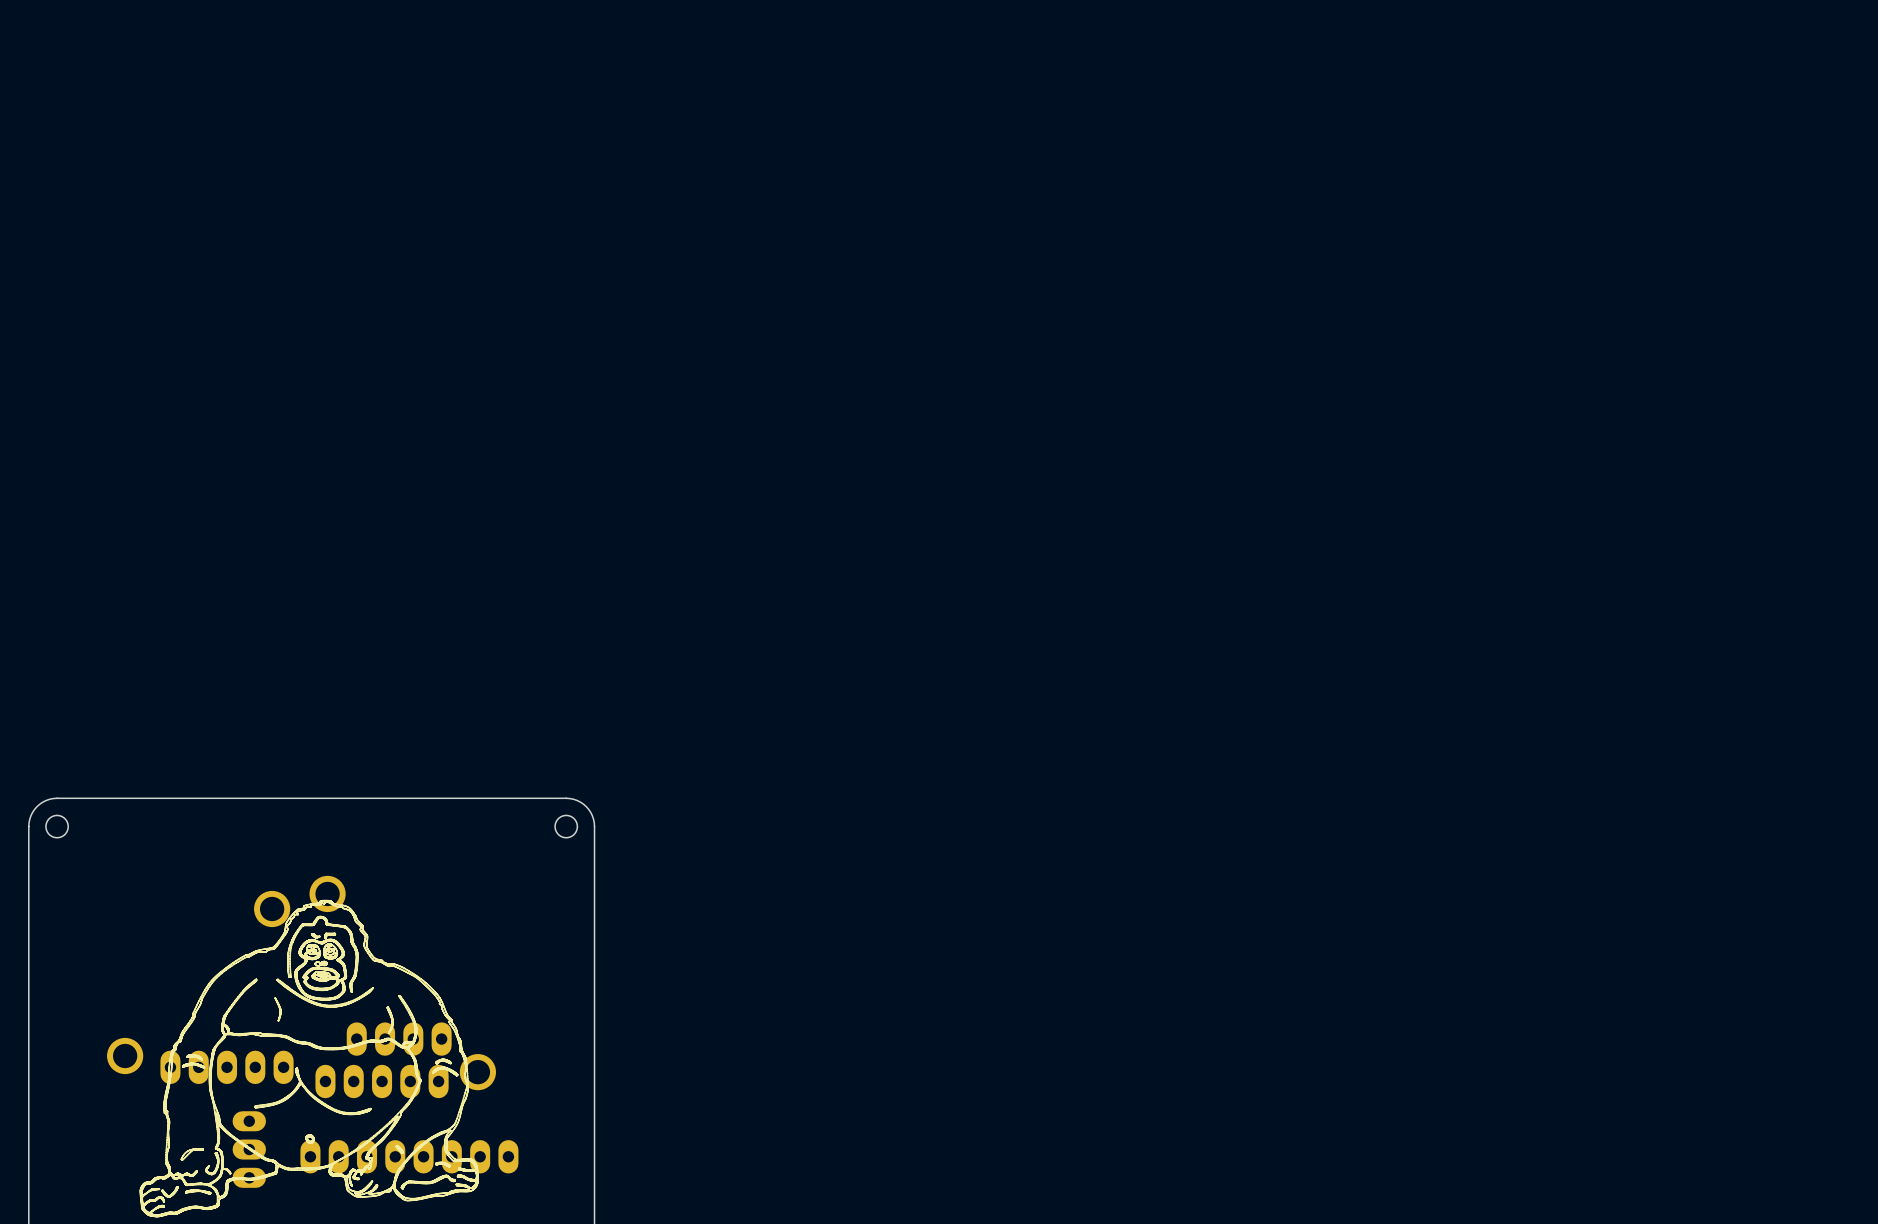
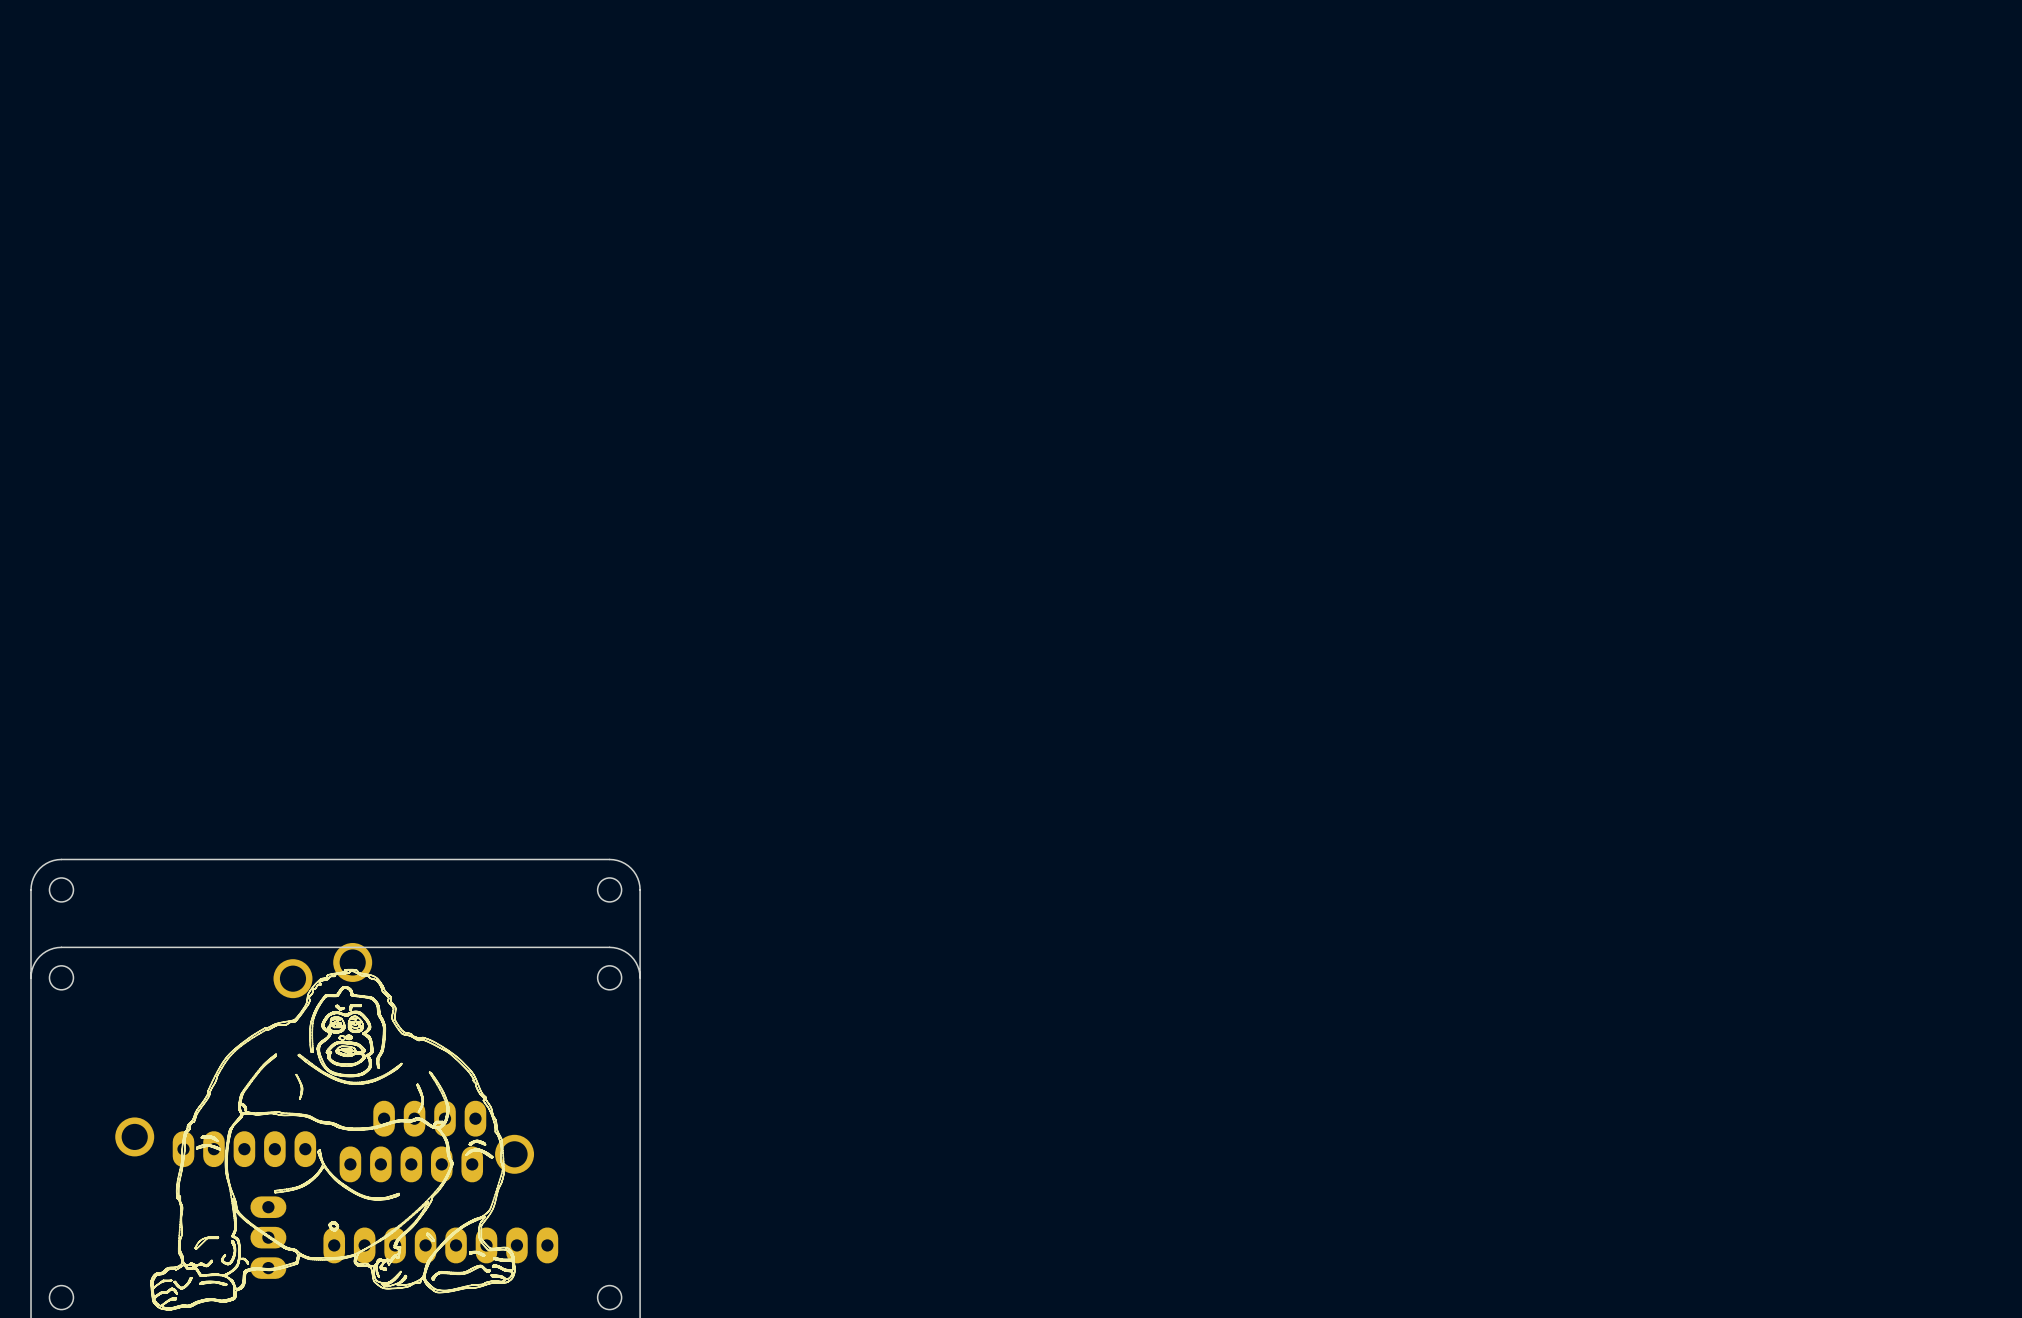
round board edge: none -> [48, 965, 75, 991]
round board edge: none -> [597, 965, 623, 991]
board edge: none -> (640, 977) (637, 966) (631, 956) (621, 949) (609, 947) (61, 947) (49, 949) (39, 956) (33, 966) (31, 977)
round board edge: none -> [48, 1285, 75, 1311]
round board edge: none -> [597, 1285, 623, 1311]

